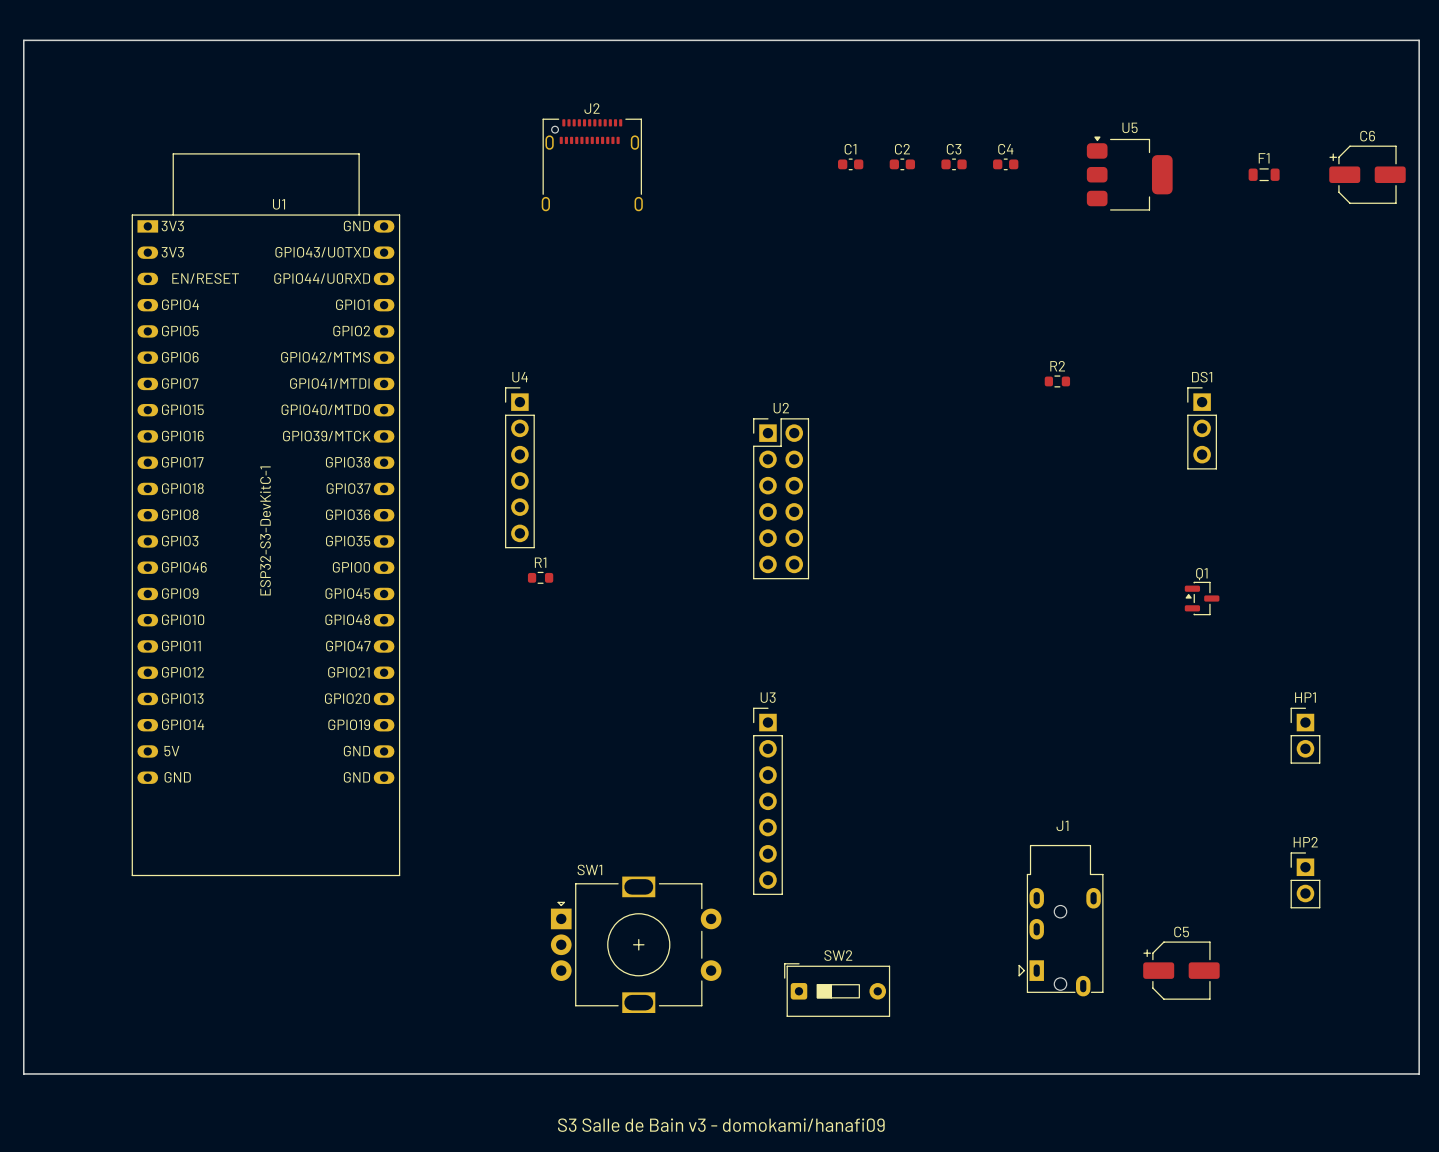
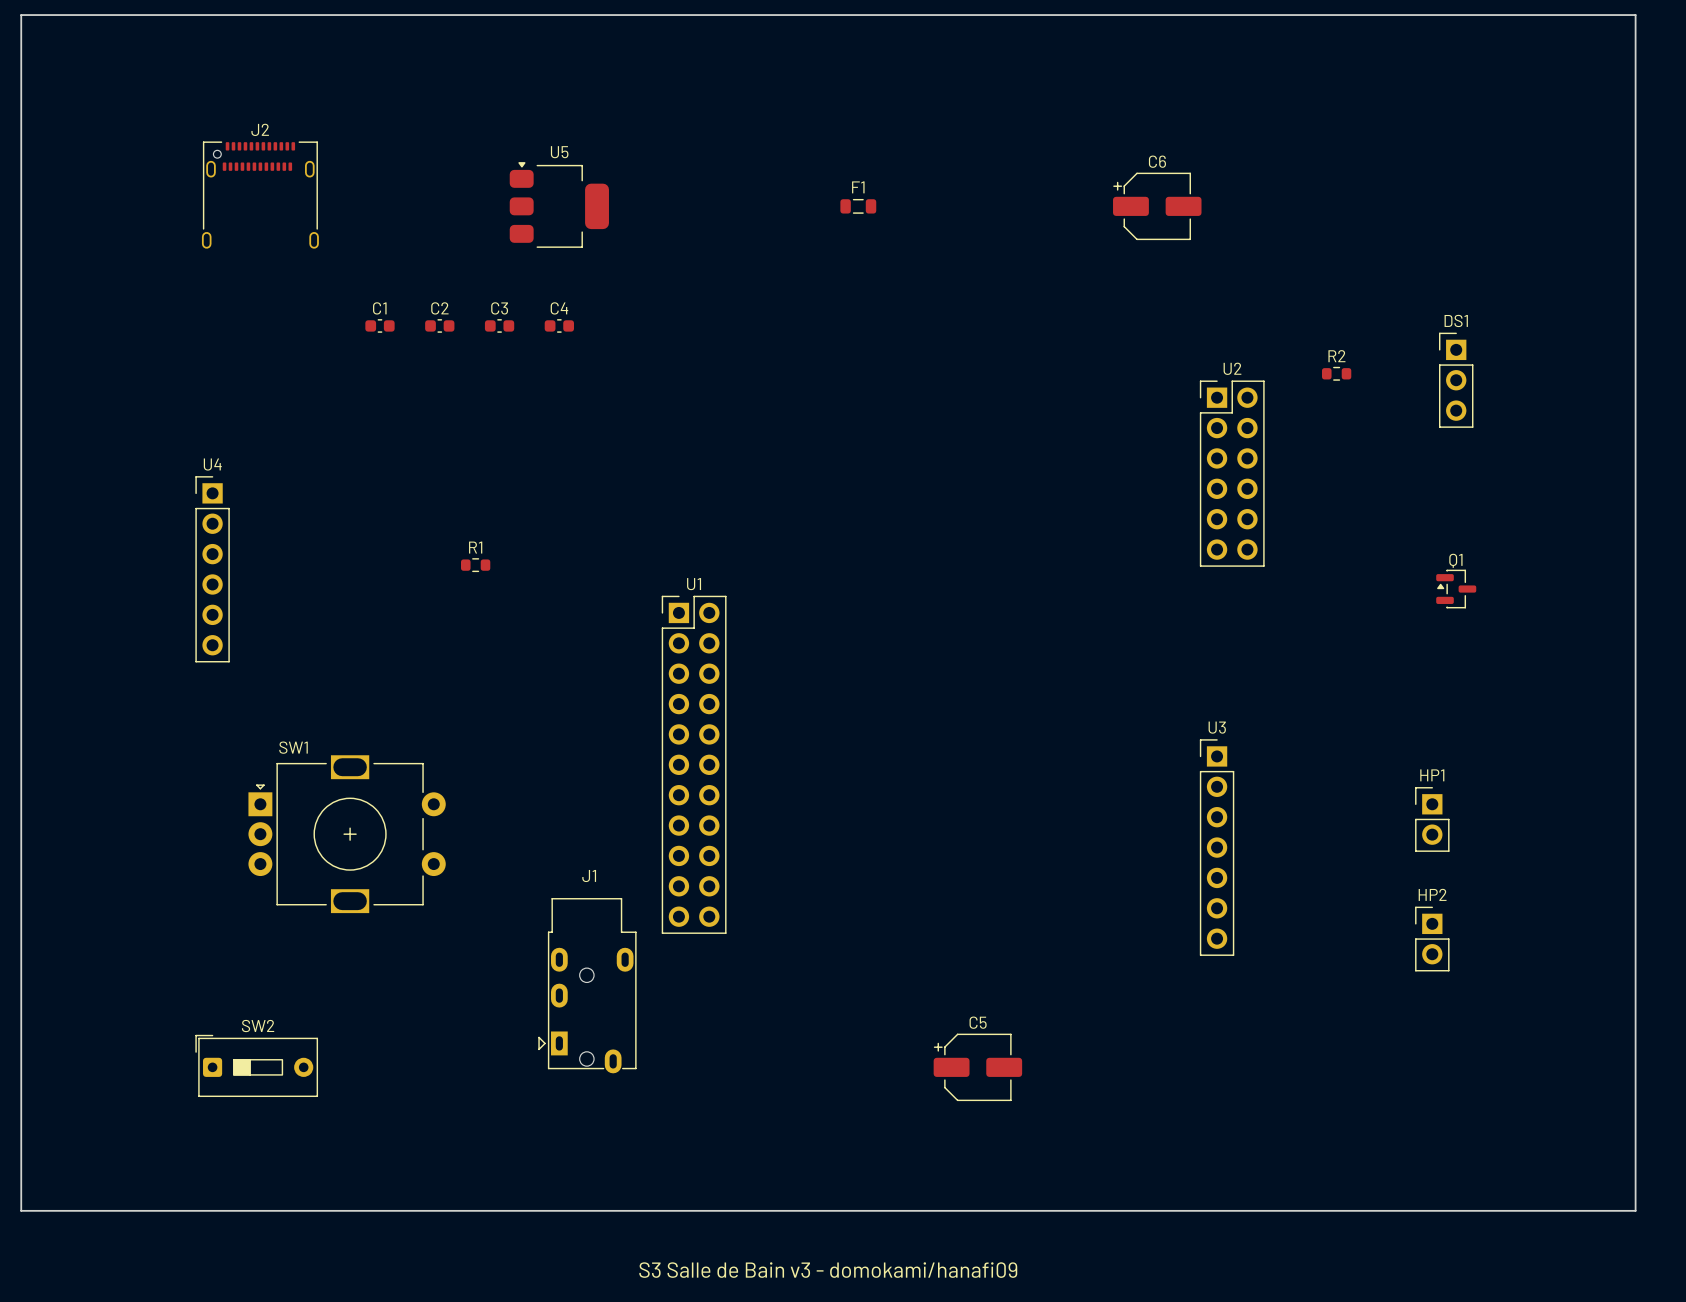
U1 footprint: [131, 153, 401, 877] -> [661, 595, 727, 934]
J2 position: (592, 164) -> (260, 195)
C1 position: (850, 164) -> (379, 325)
C2 position: (902, 164) -> (439, 325)
C3 position: (954, 164) -> (499, 325)
C4 position: (1005, 164) -> (559, 325)
U5 position: (1129, 173) -> (559, 204)
F1 position: (1264, 174) -> (858, 206)
C6 position: (1367, 174) -> (1157, 206)
U1 name position: U1 (279, 204) -> U1 (694, 584)
R2 position: (1057, 381) -> (1336, 373)
DS1 position: (1202, 428) -> (1456, 380)
U4 position: (519, 467) -> (212, 569)
U2 position: (781, 498) -> (1232, 473)
U1 value: ESP32-S3-DevKitC-1 (265, 530) -> none
R1 position: (540, 577) -> (475, 565)
Q1 position: (1202, 598) -> (1456, 589)
HP1 position: (1305, 735) -> (1432, 819)
U3 position: (767, 801) -> (1217, 847)
HP2 position: (1305, 880) -> (1432, 939)
J1 position: (1061, 920) -> (587, 985)
SW1 position: (636, 944) -> (347, 834)
C5 position: (1181, 970) -> (977, 1067)
SW2 position: (837, 990) -> (256, 1065)

